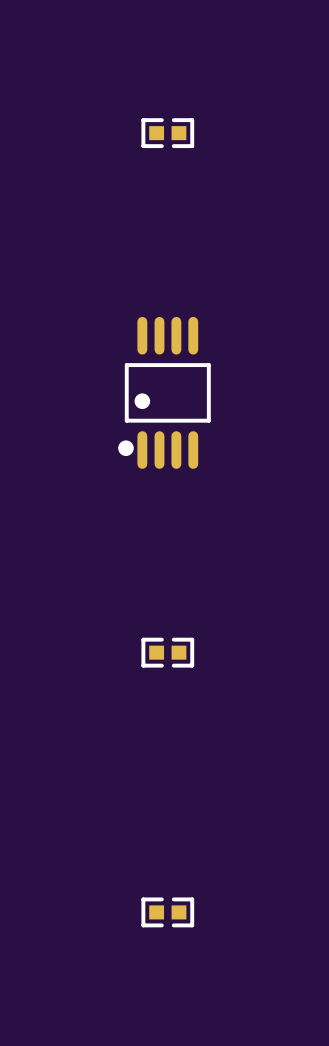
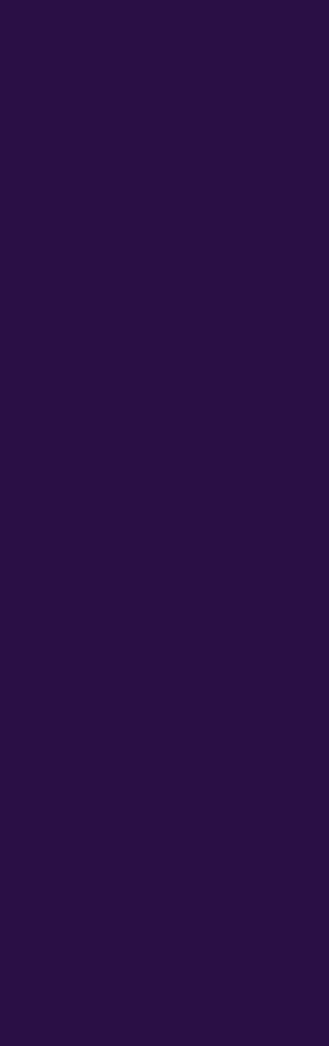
part: (167, 133) -> none
part: (164, 392) -> none
part: (167, 652) -> none
part: (167, 912) -> none

